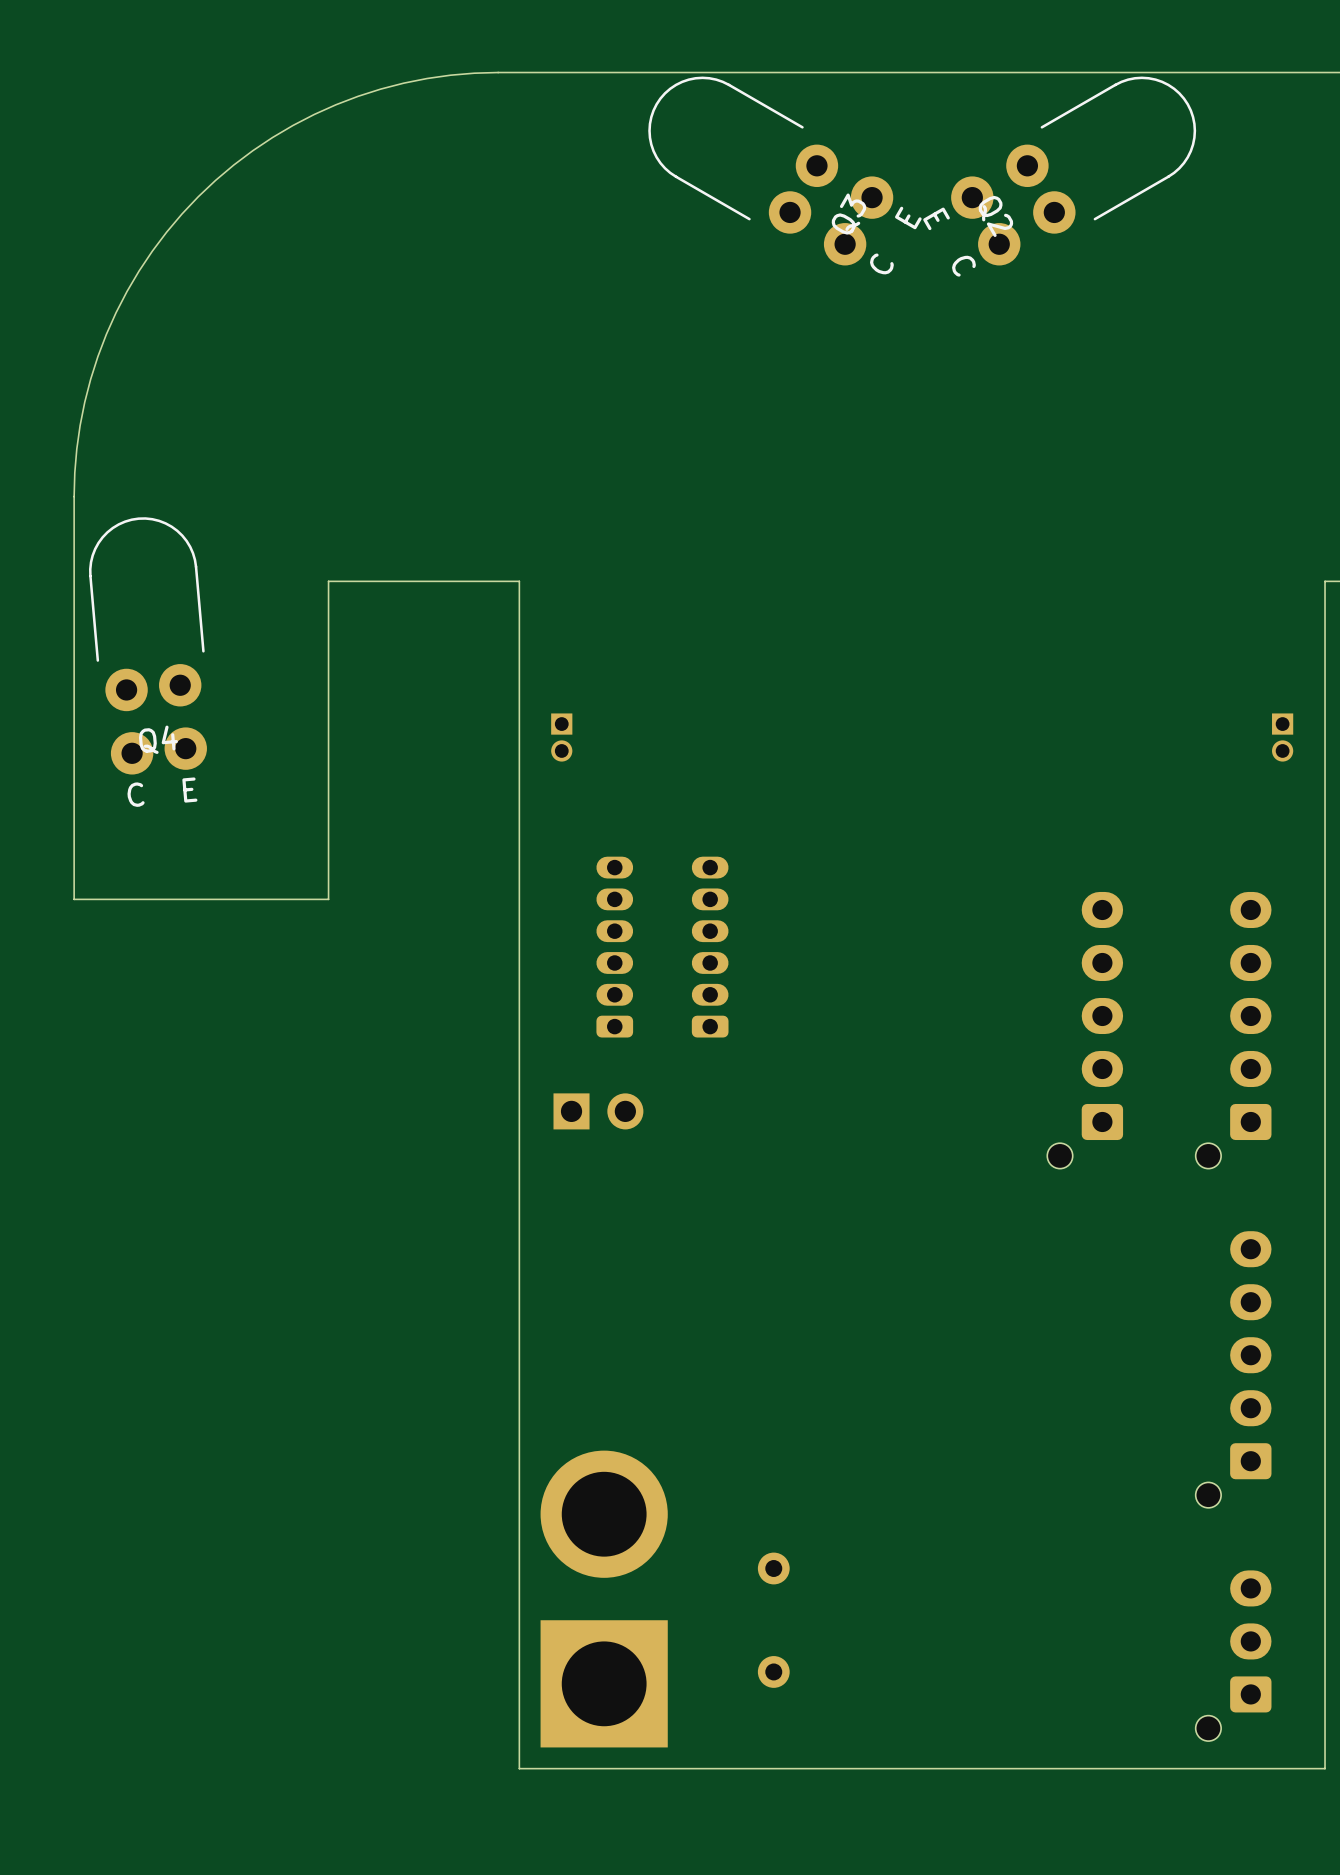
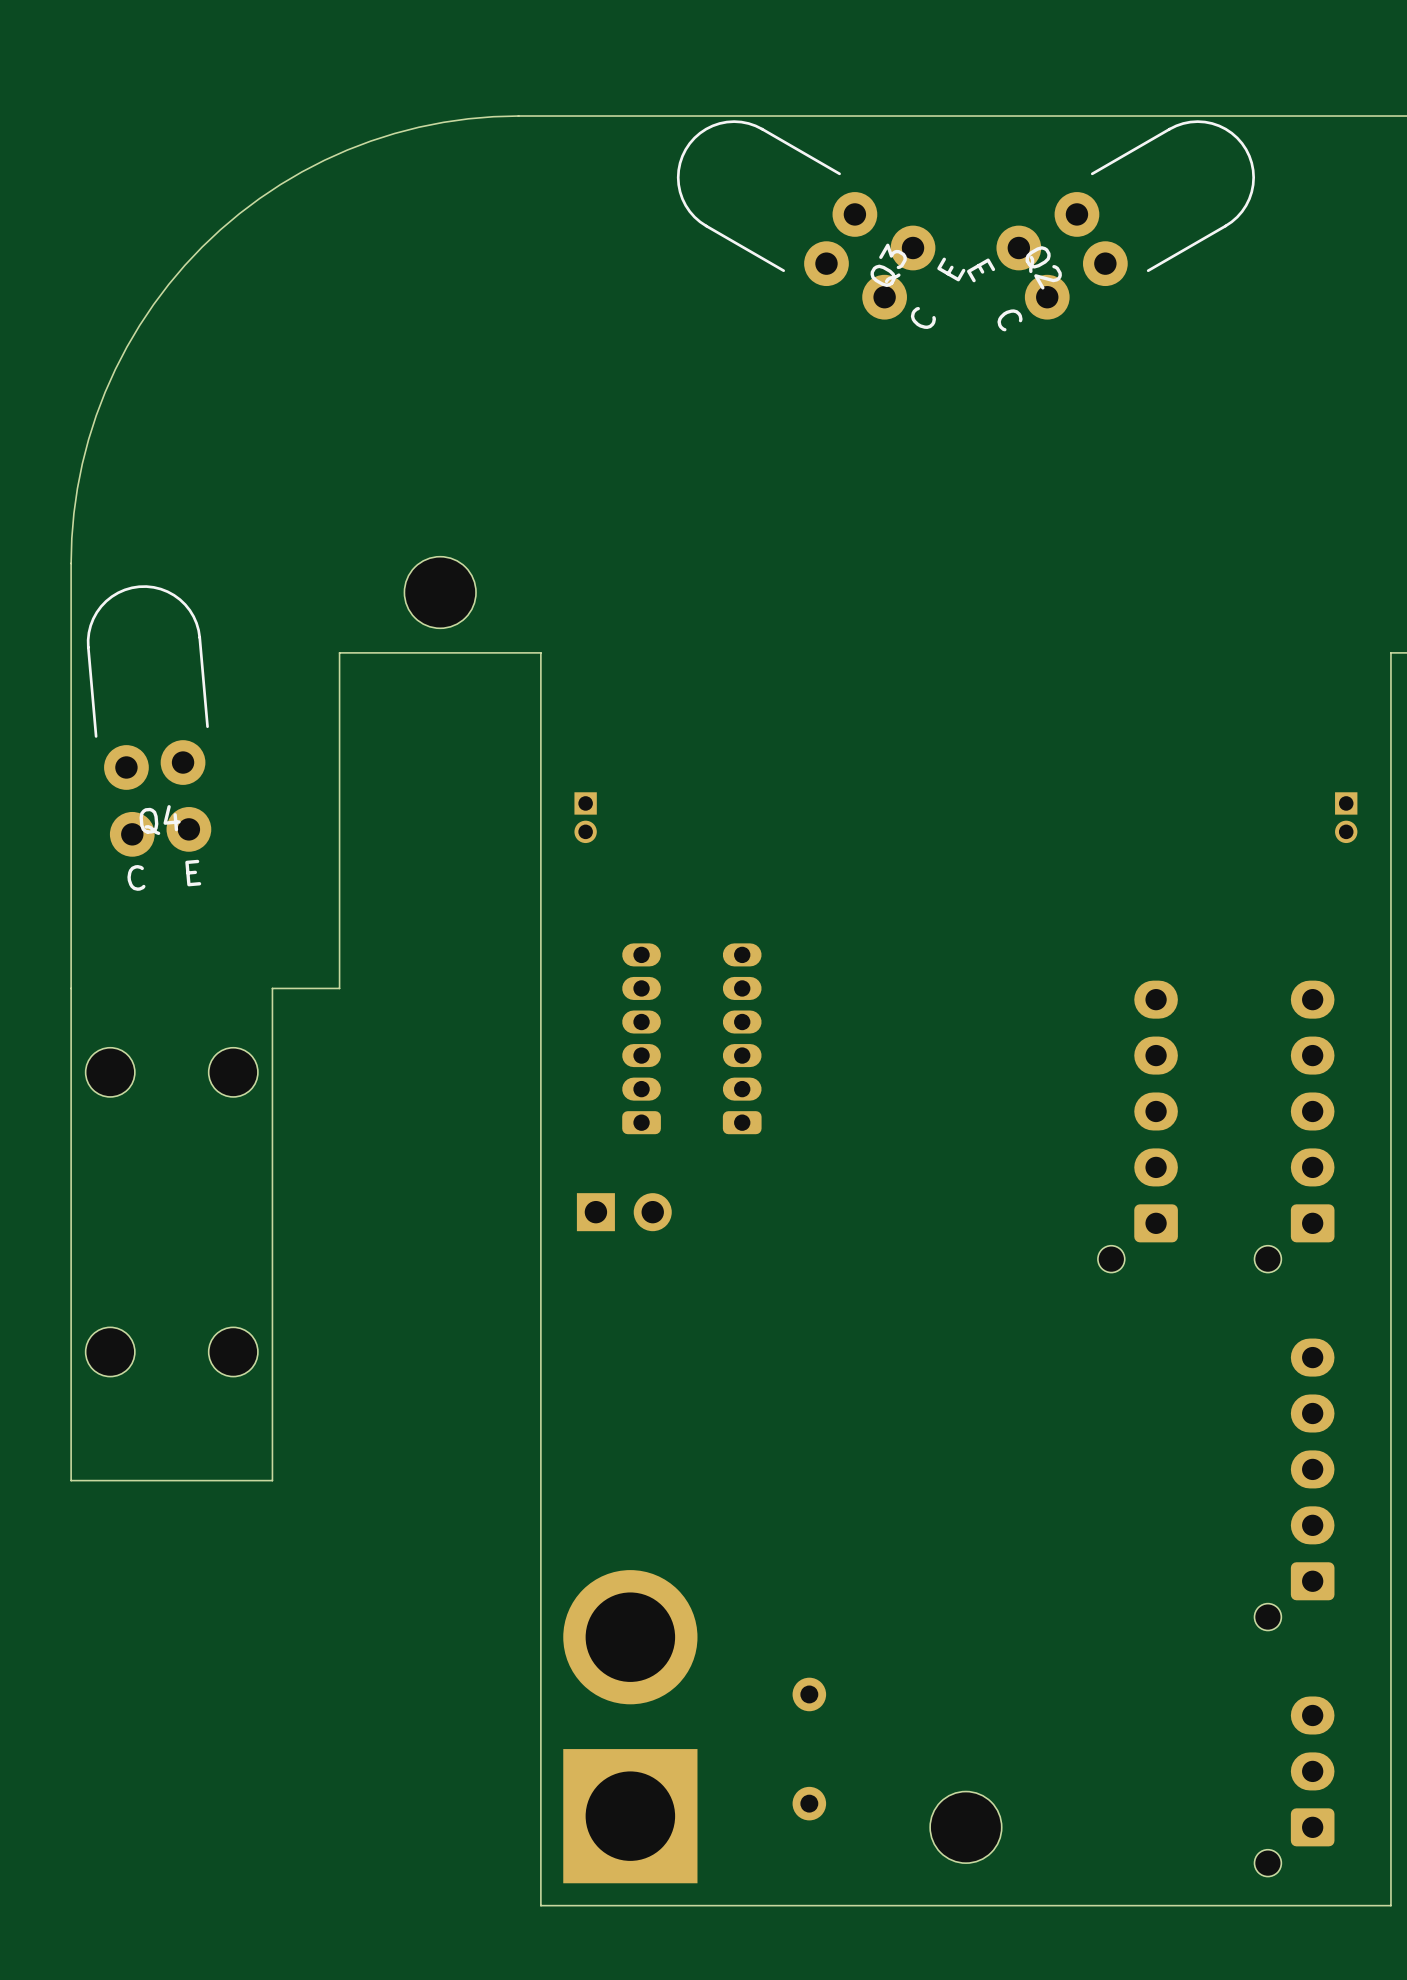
part: none -> (440, 592)
board edge: (264, 899) (74, 899) -> (272, 988) (272, 1480) (71, 1480) (71, 988)
part: none -> (110, 1072)
part: none -> (233, 1072)
part: none -> (110, 1351)
part: none -> (233, 1351)
part: none -> (965, 1827)

